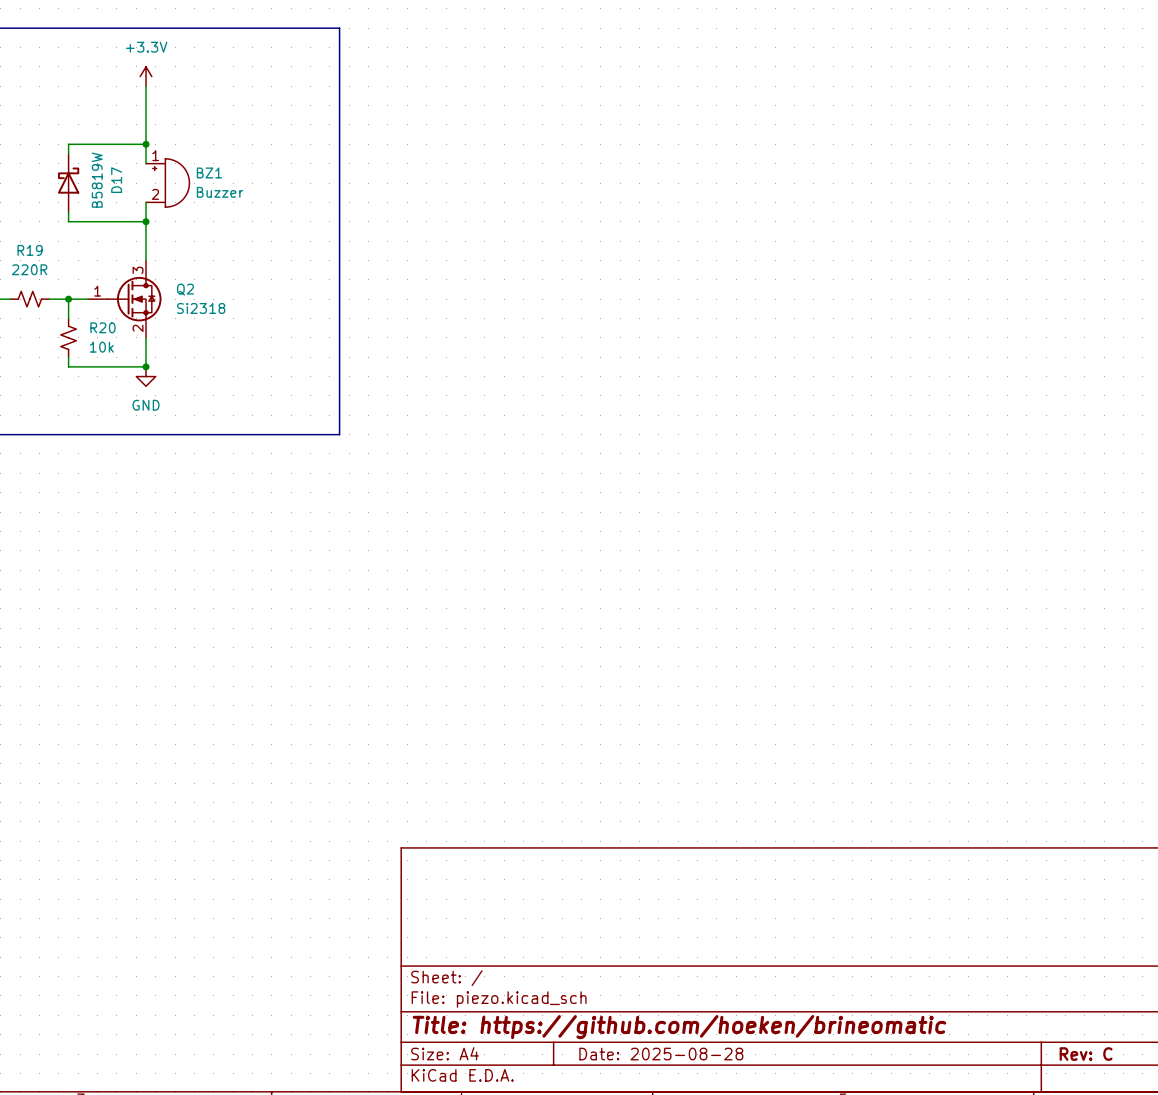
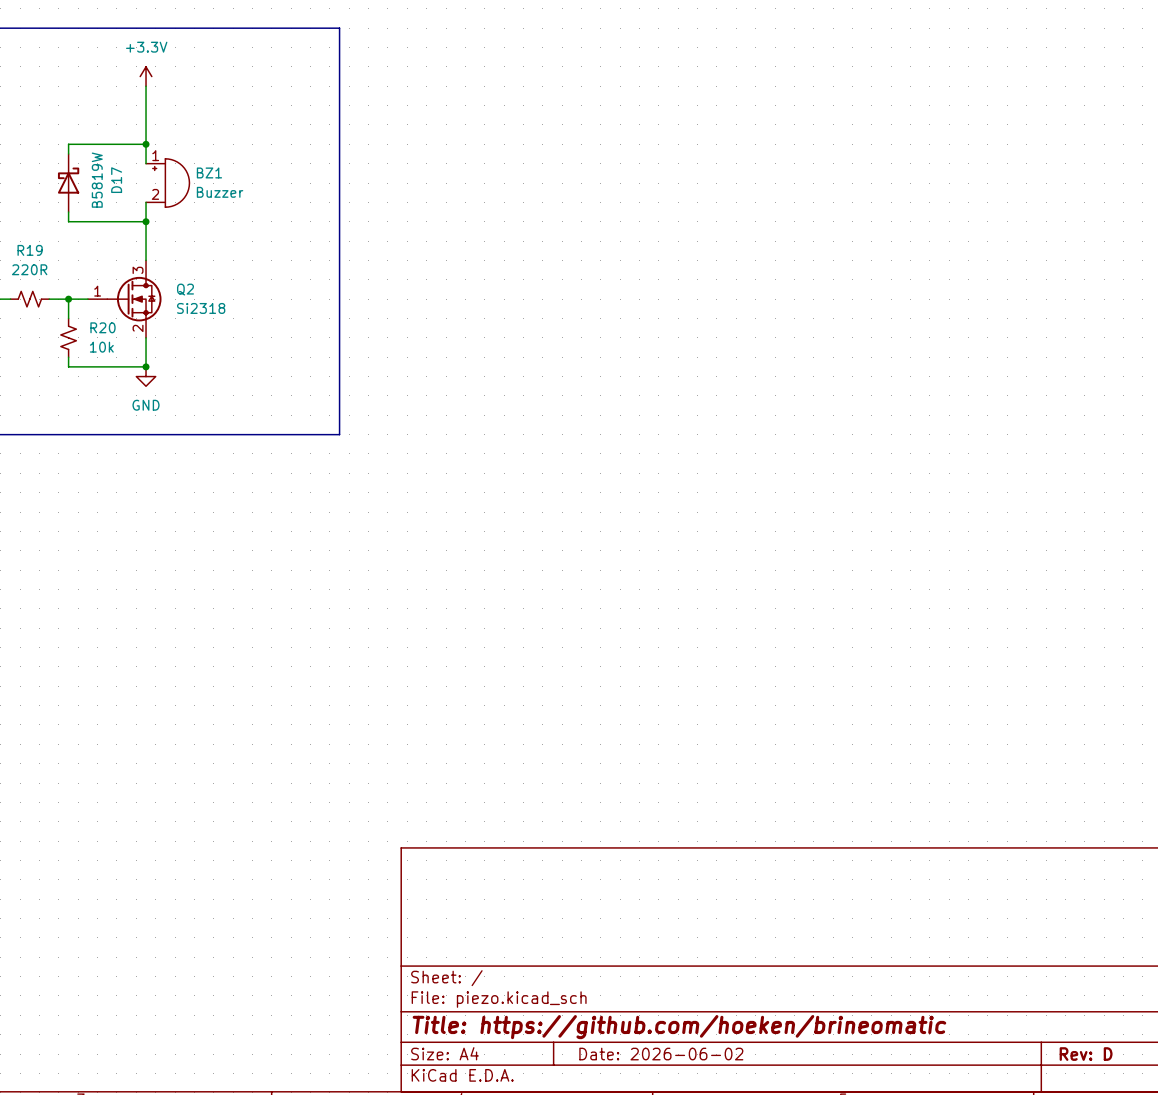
title block: Date: 2025-08-28 (661, 1054) -> Date: 2026-06-02 (661, 1054)
title block: Rev: C (1086, 1054) -> Rev: D (1086, 1054)

